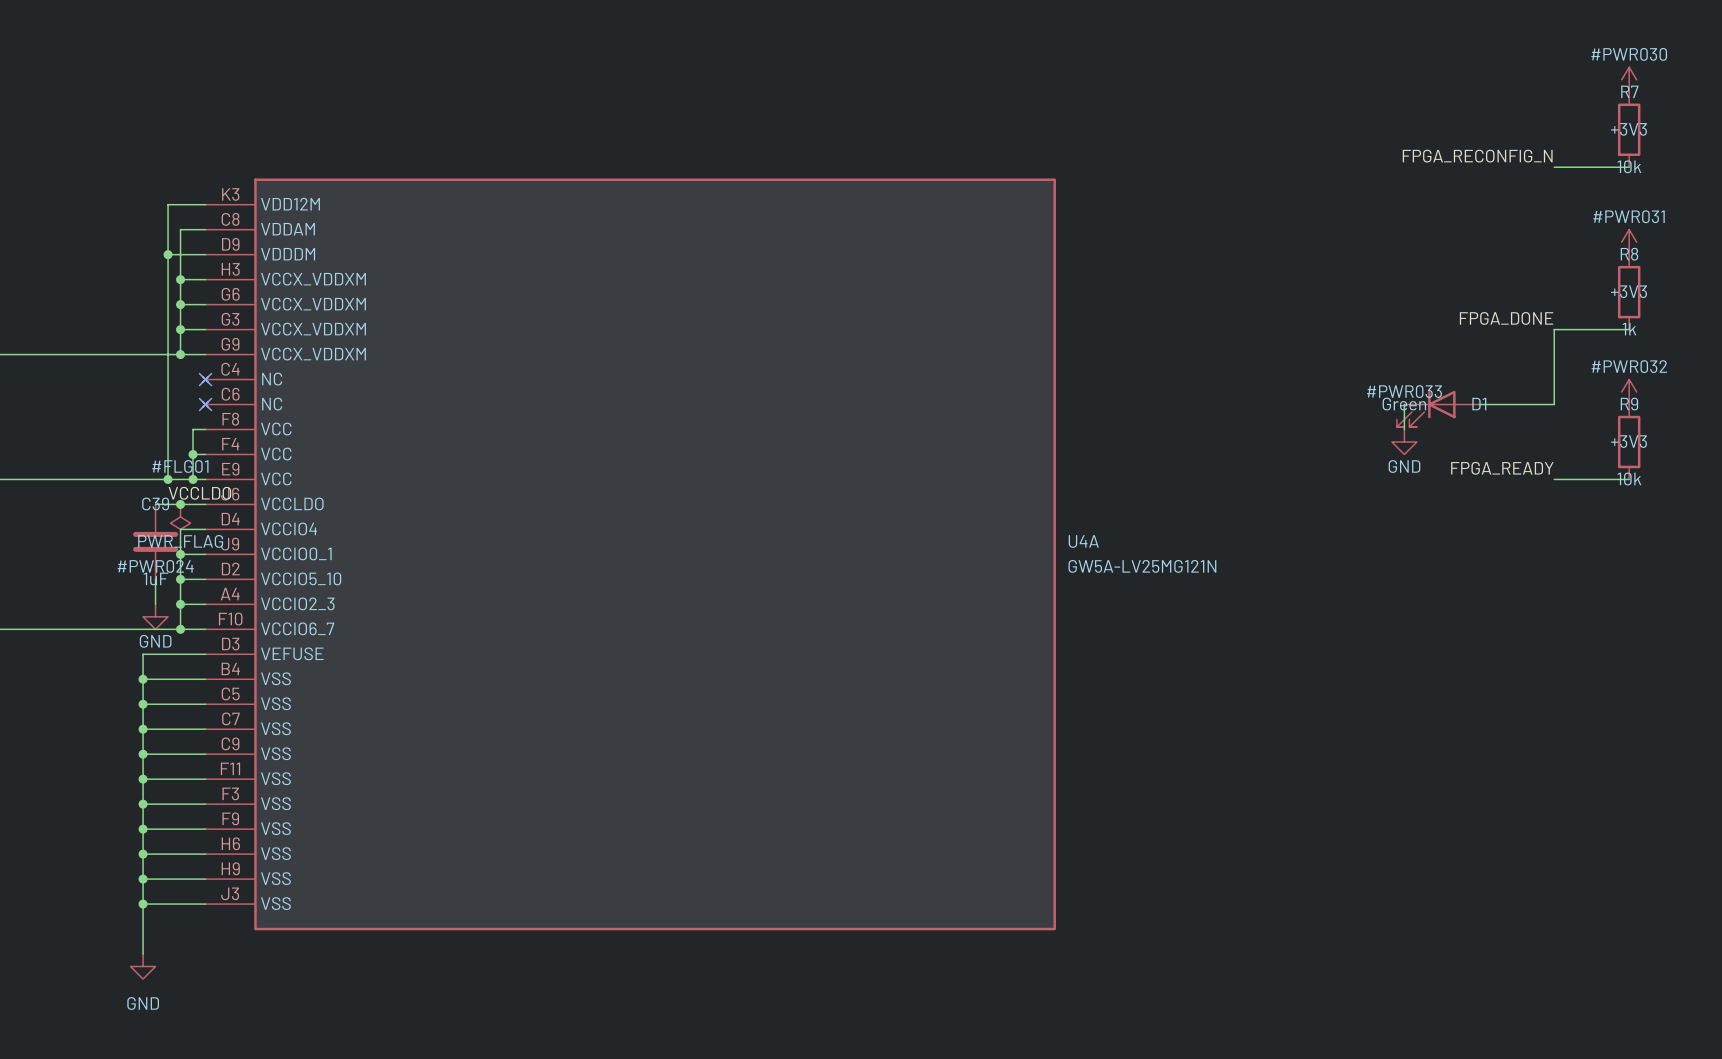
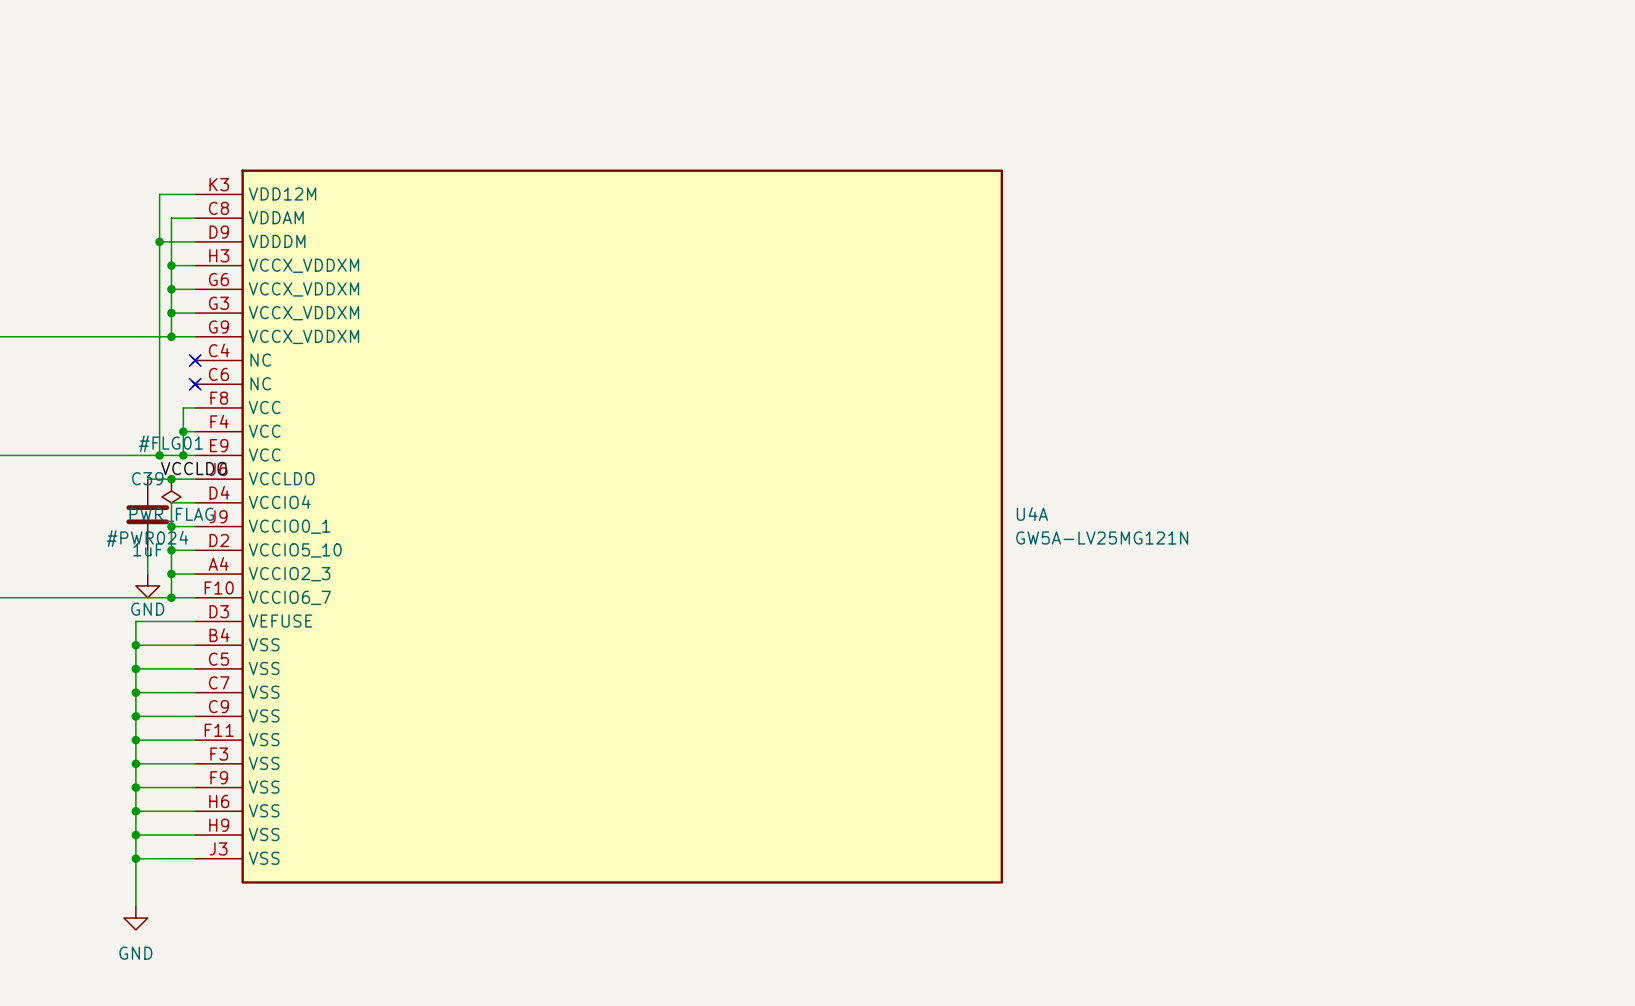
#PWR030: +3V3 (1629, 79) -> none
R7: 10k (1629, 129) -> none
label: FPGA_RECONFIG_N (1477, 156) -> none
wire: (1554, 167) (1629, 167) -> none
#PWR031: +3V3 (1629, 242) -> none
R8: 1k (1629, 292) -> none
label: FPGA_DONE (1506, 318) -> none
wire: (1629, 329) (1554, 329) (1554, 404) (1479, 404) -> none
#PWR032: +3V3 (1629, 392) -> none
wire: (1404, 404) (1404, 429) -> none
D1: Green (1438, 408) -> none
#PWR033: GND (1404, 441) -> none
R9: 10k (1629, 441) -> none
label: FPGA_READY (1502, 468) -> none
wire: (1554, 479) (1629, 479) -> none

